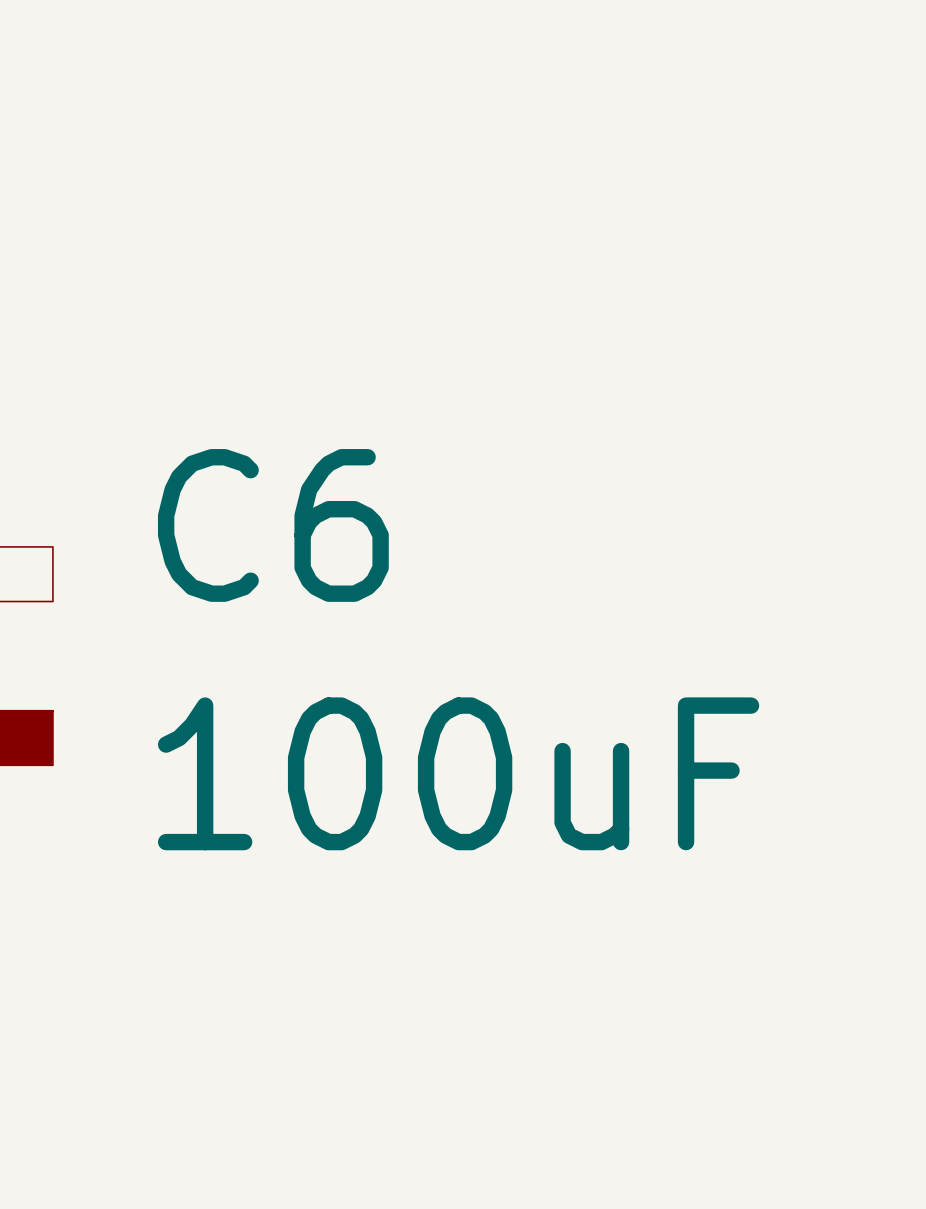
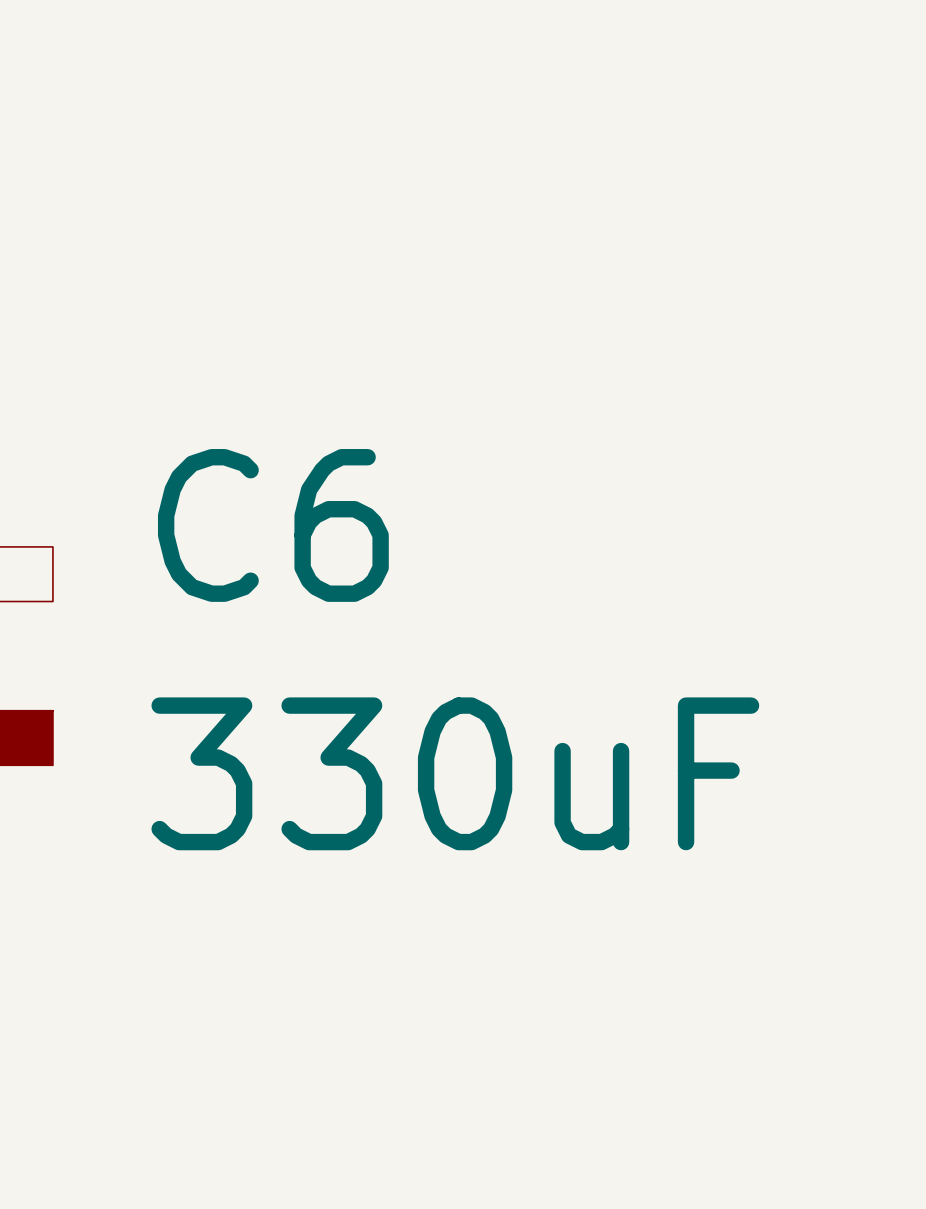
C6 value: 100uF (458, 773) -> 330uF (455, 773)

